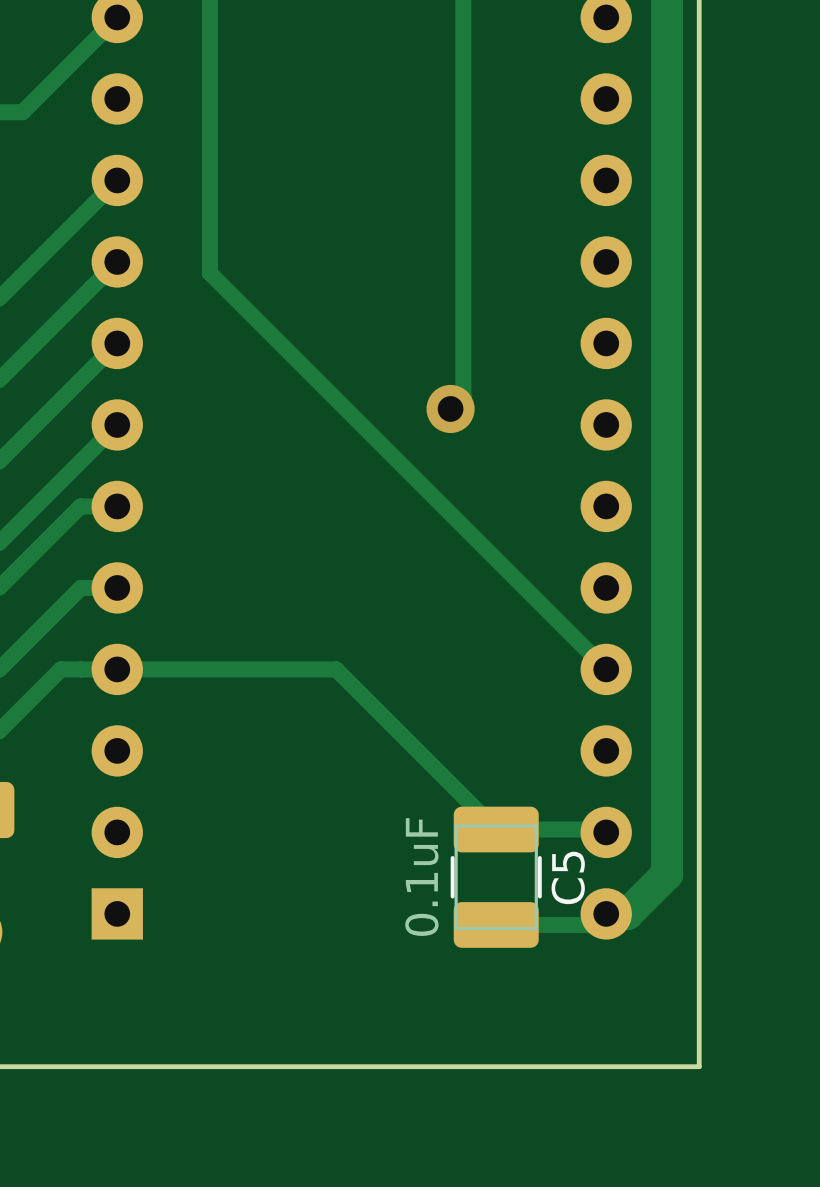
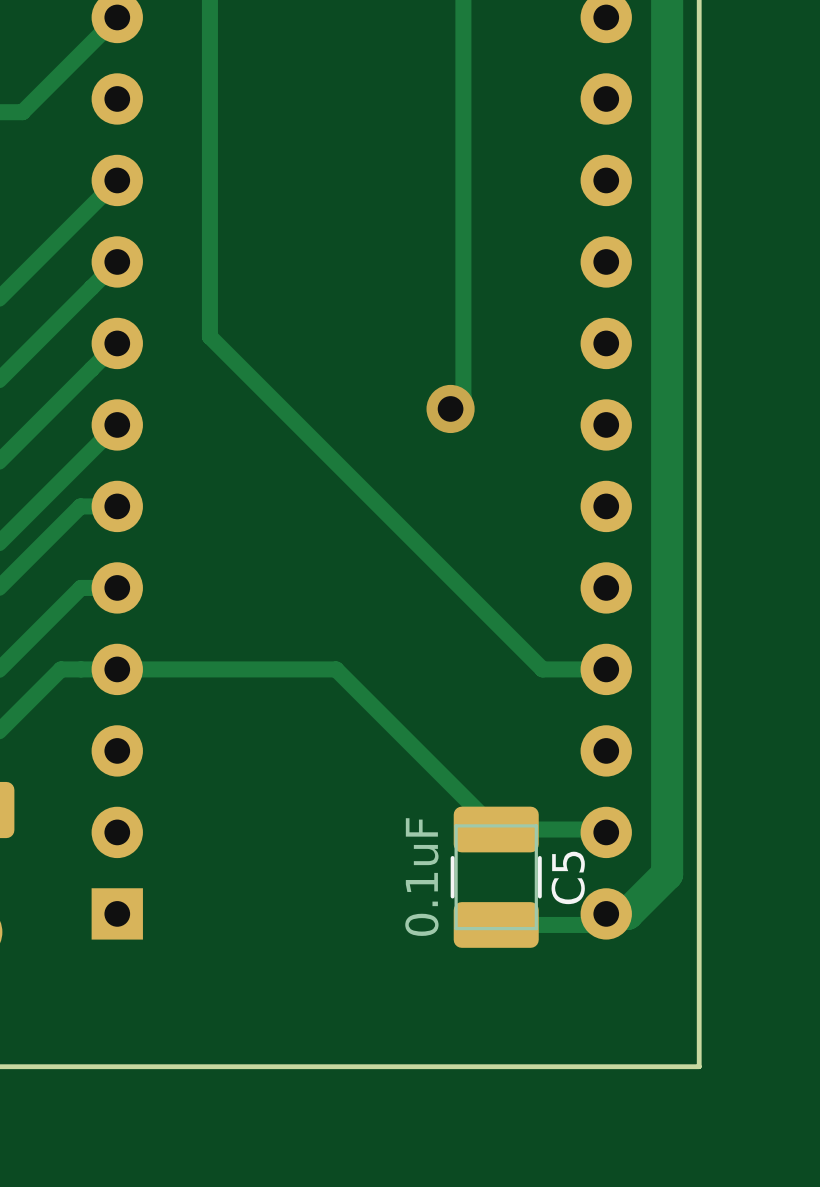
track: (209, 273) (606, 669) -> (209, 273) (209, 336) (542, 669) (606, 669)

